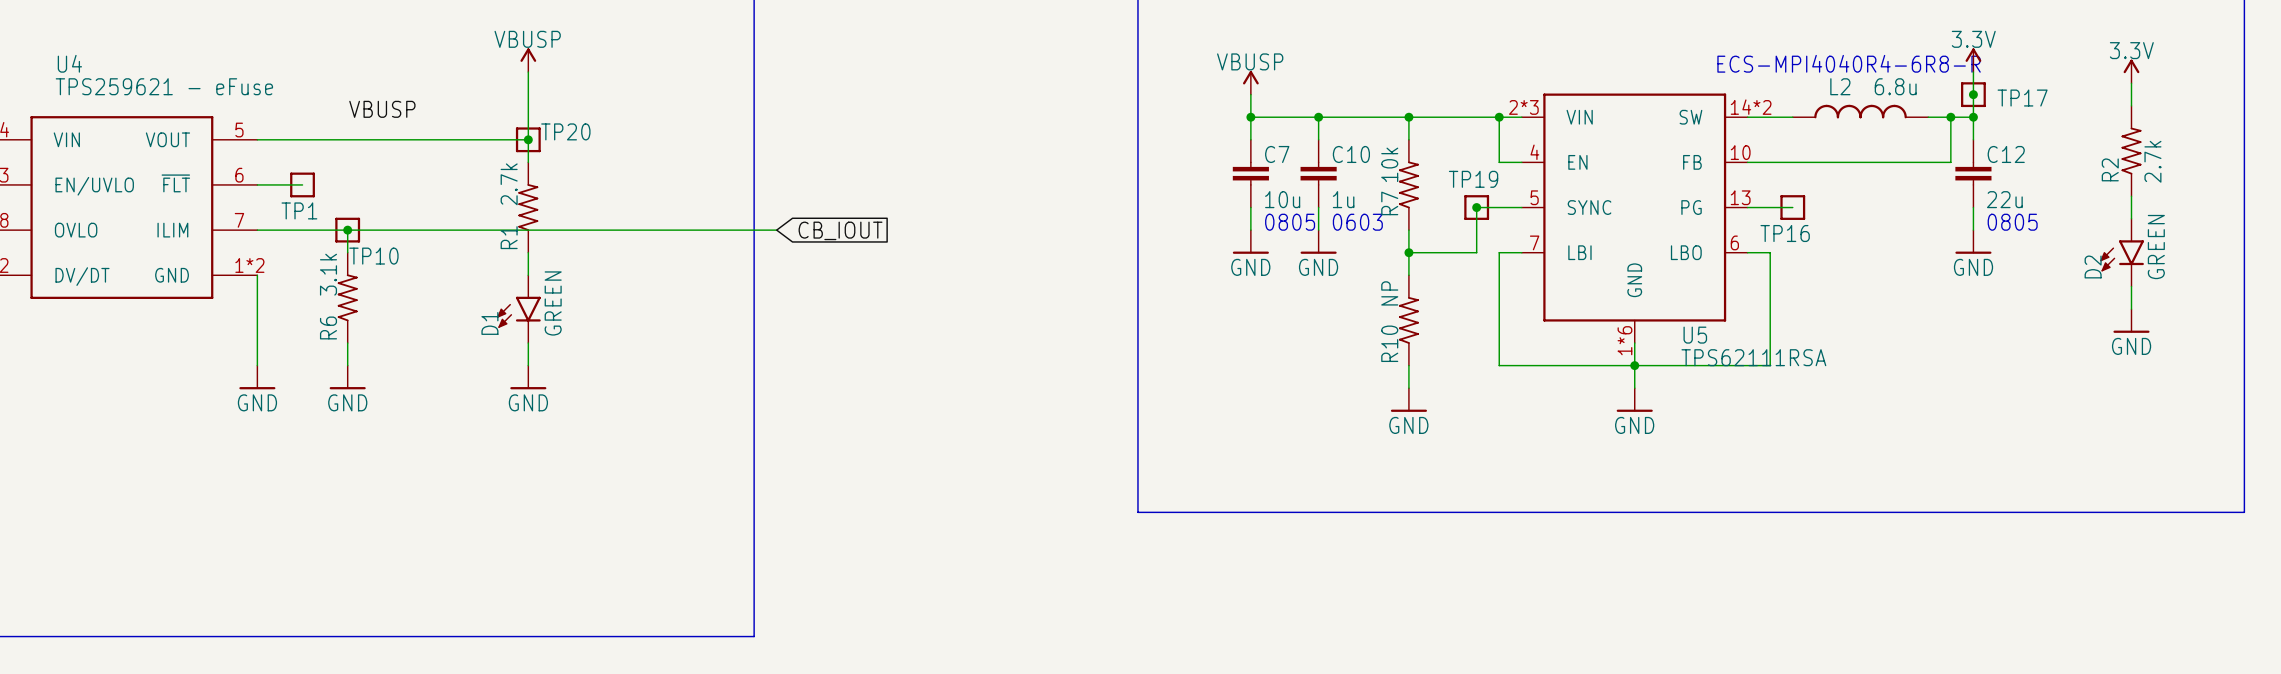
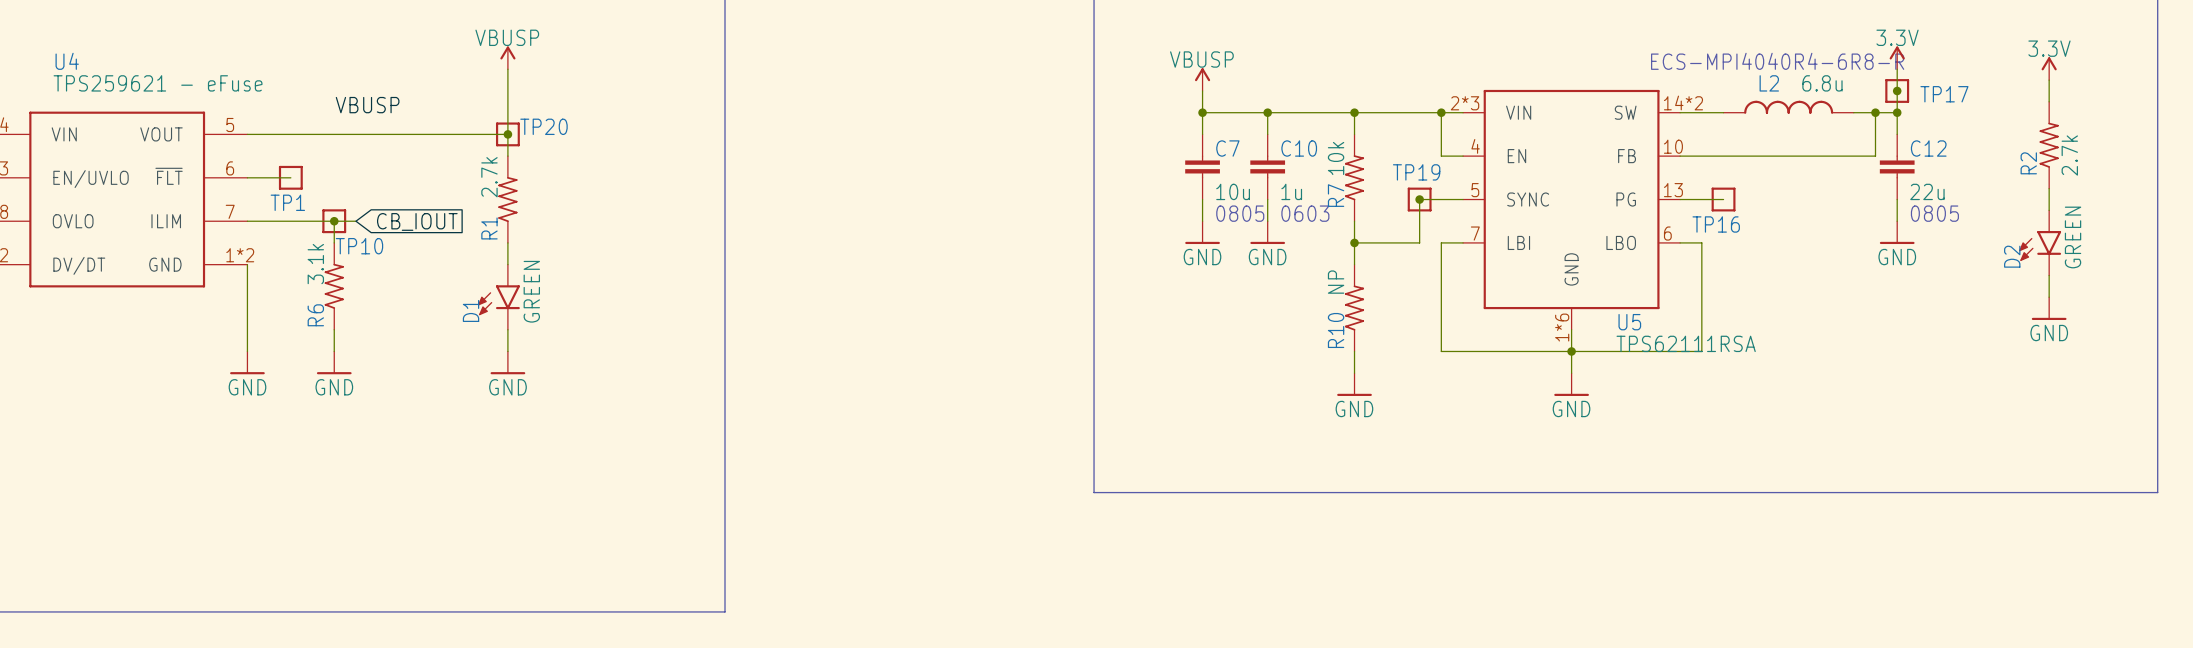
wire: (370, 230) (776, 230) -> none
global label: none -> CB_IOUT (417, 221)
global label: CB_IOUT (840, 230) -> none

